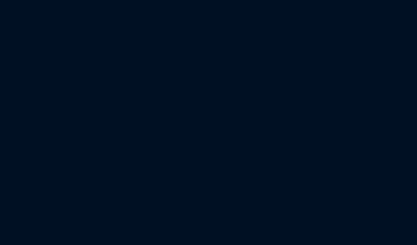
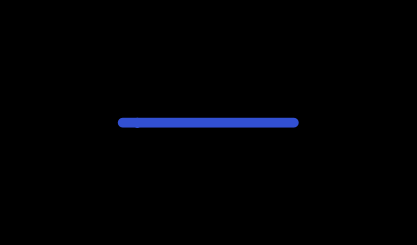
bottom track: none -> (293, 122) (122, 122)

